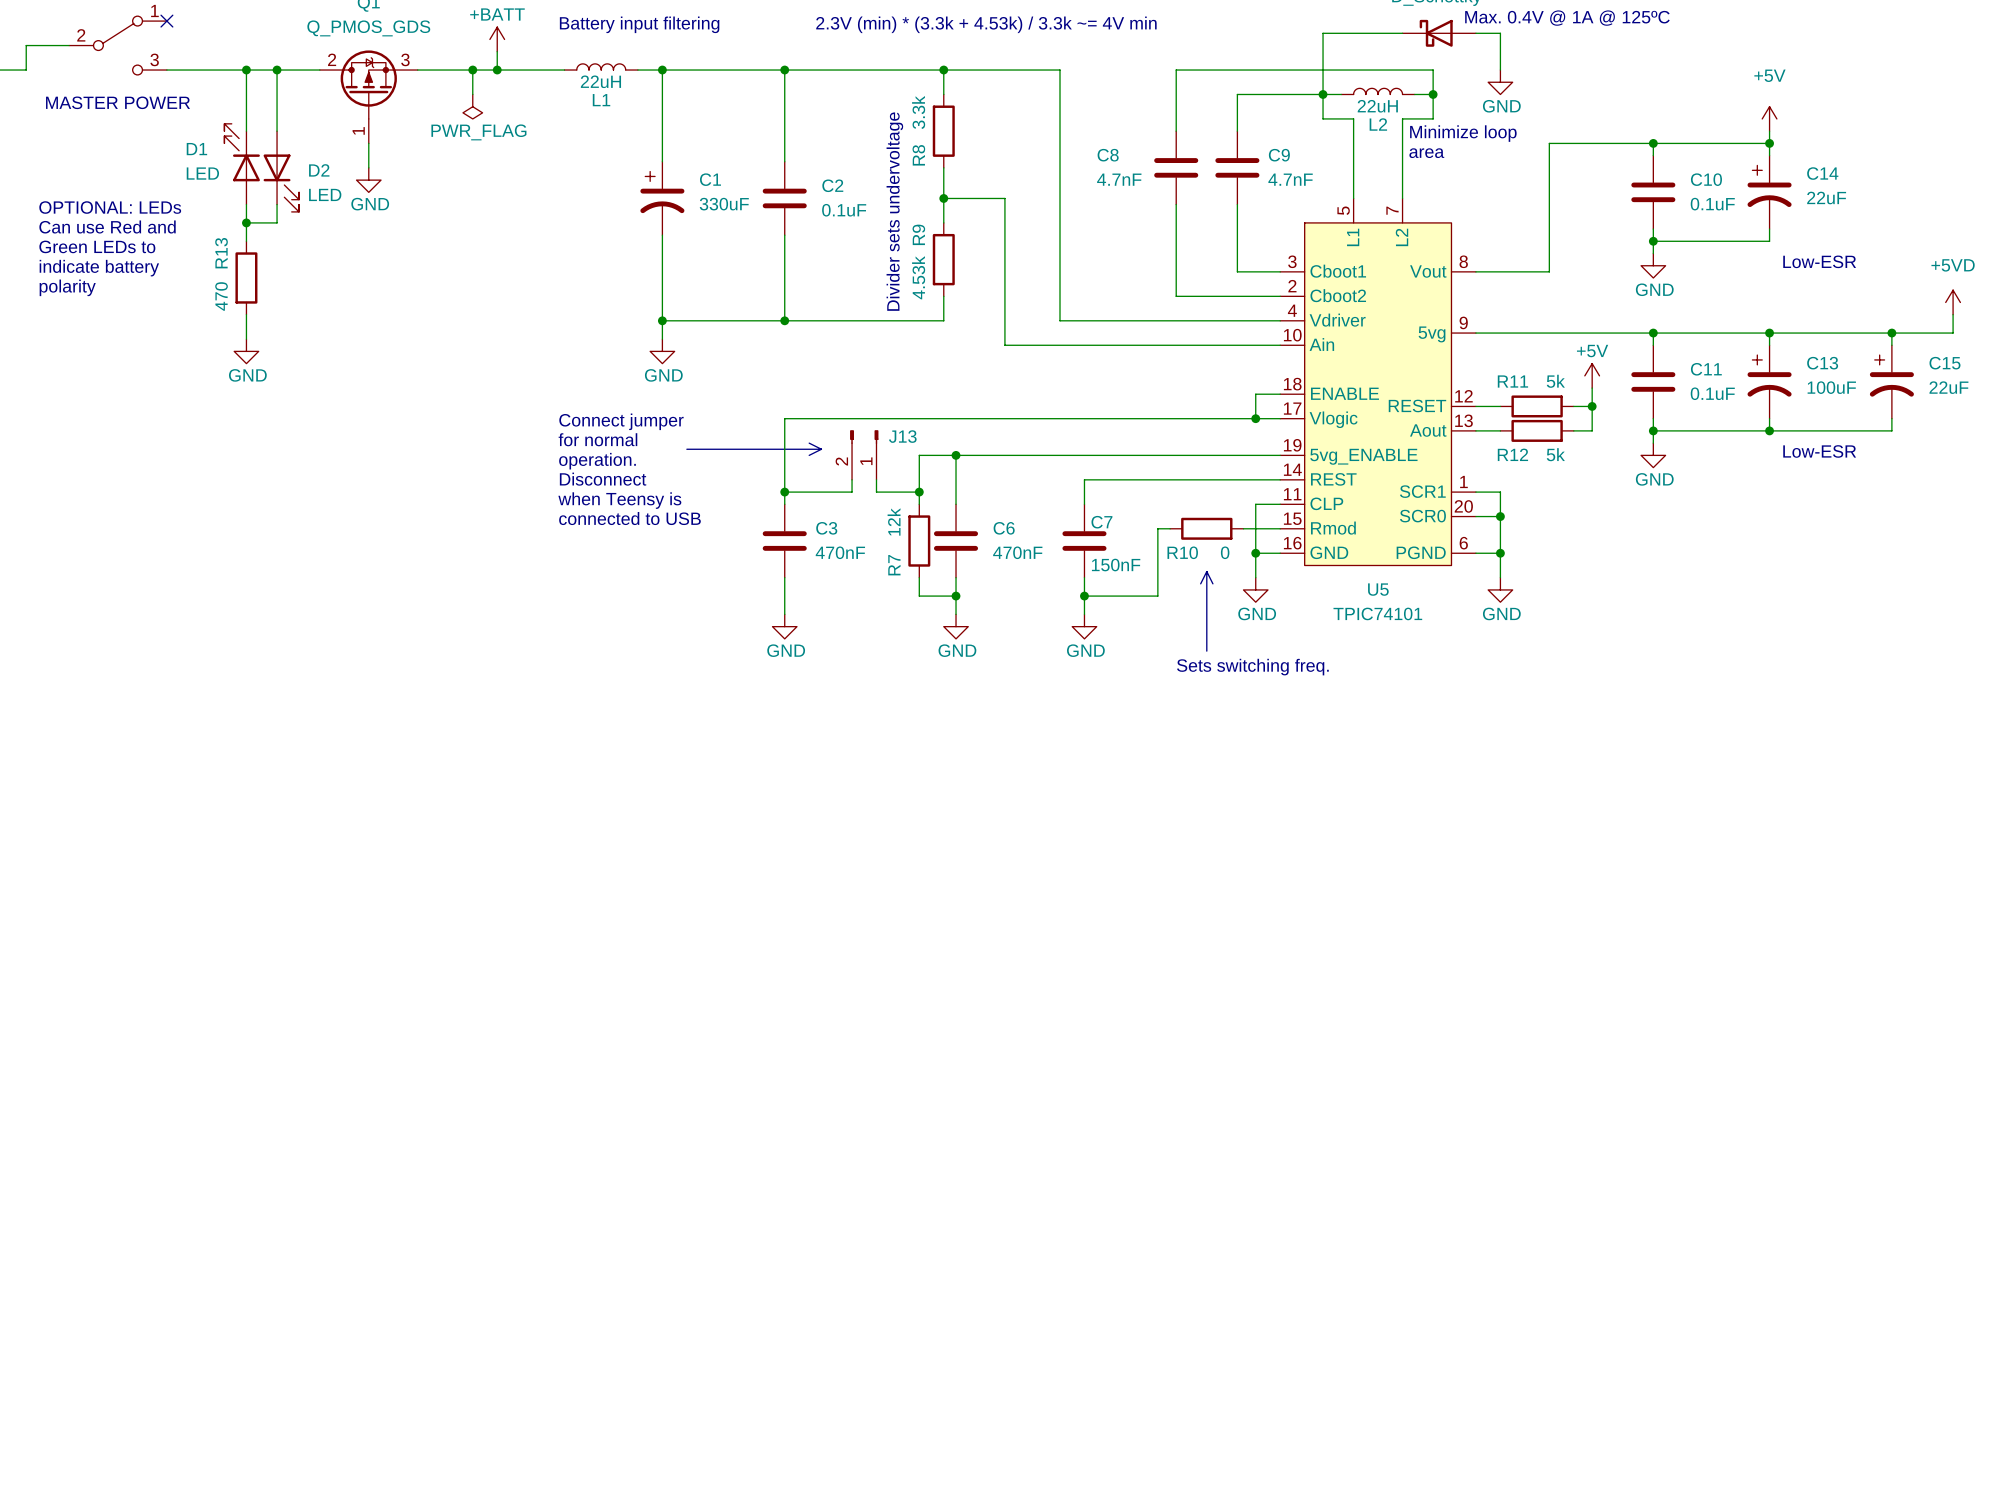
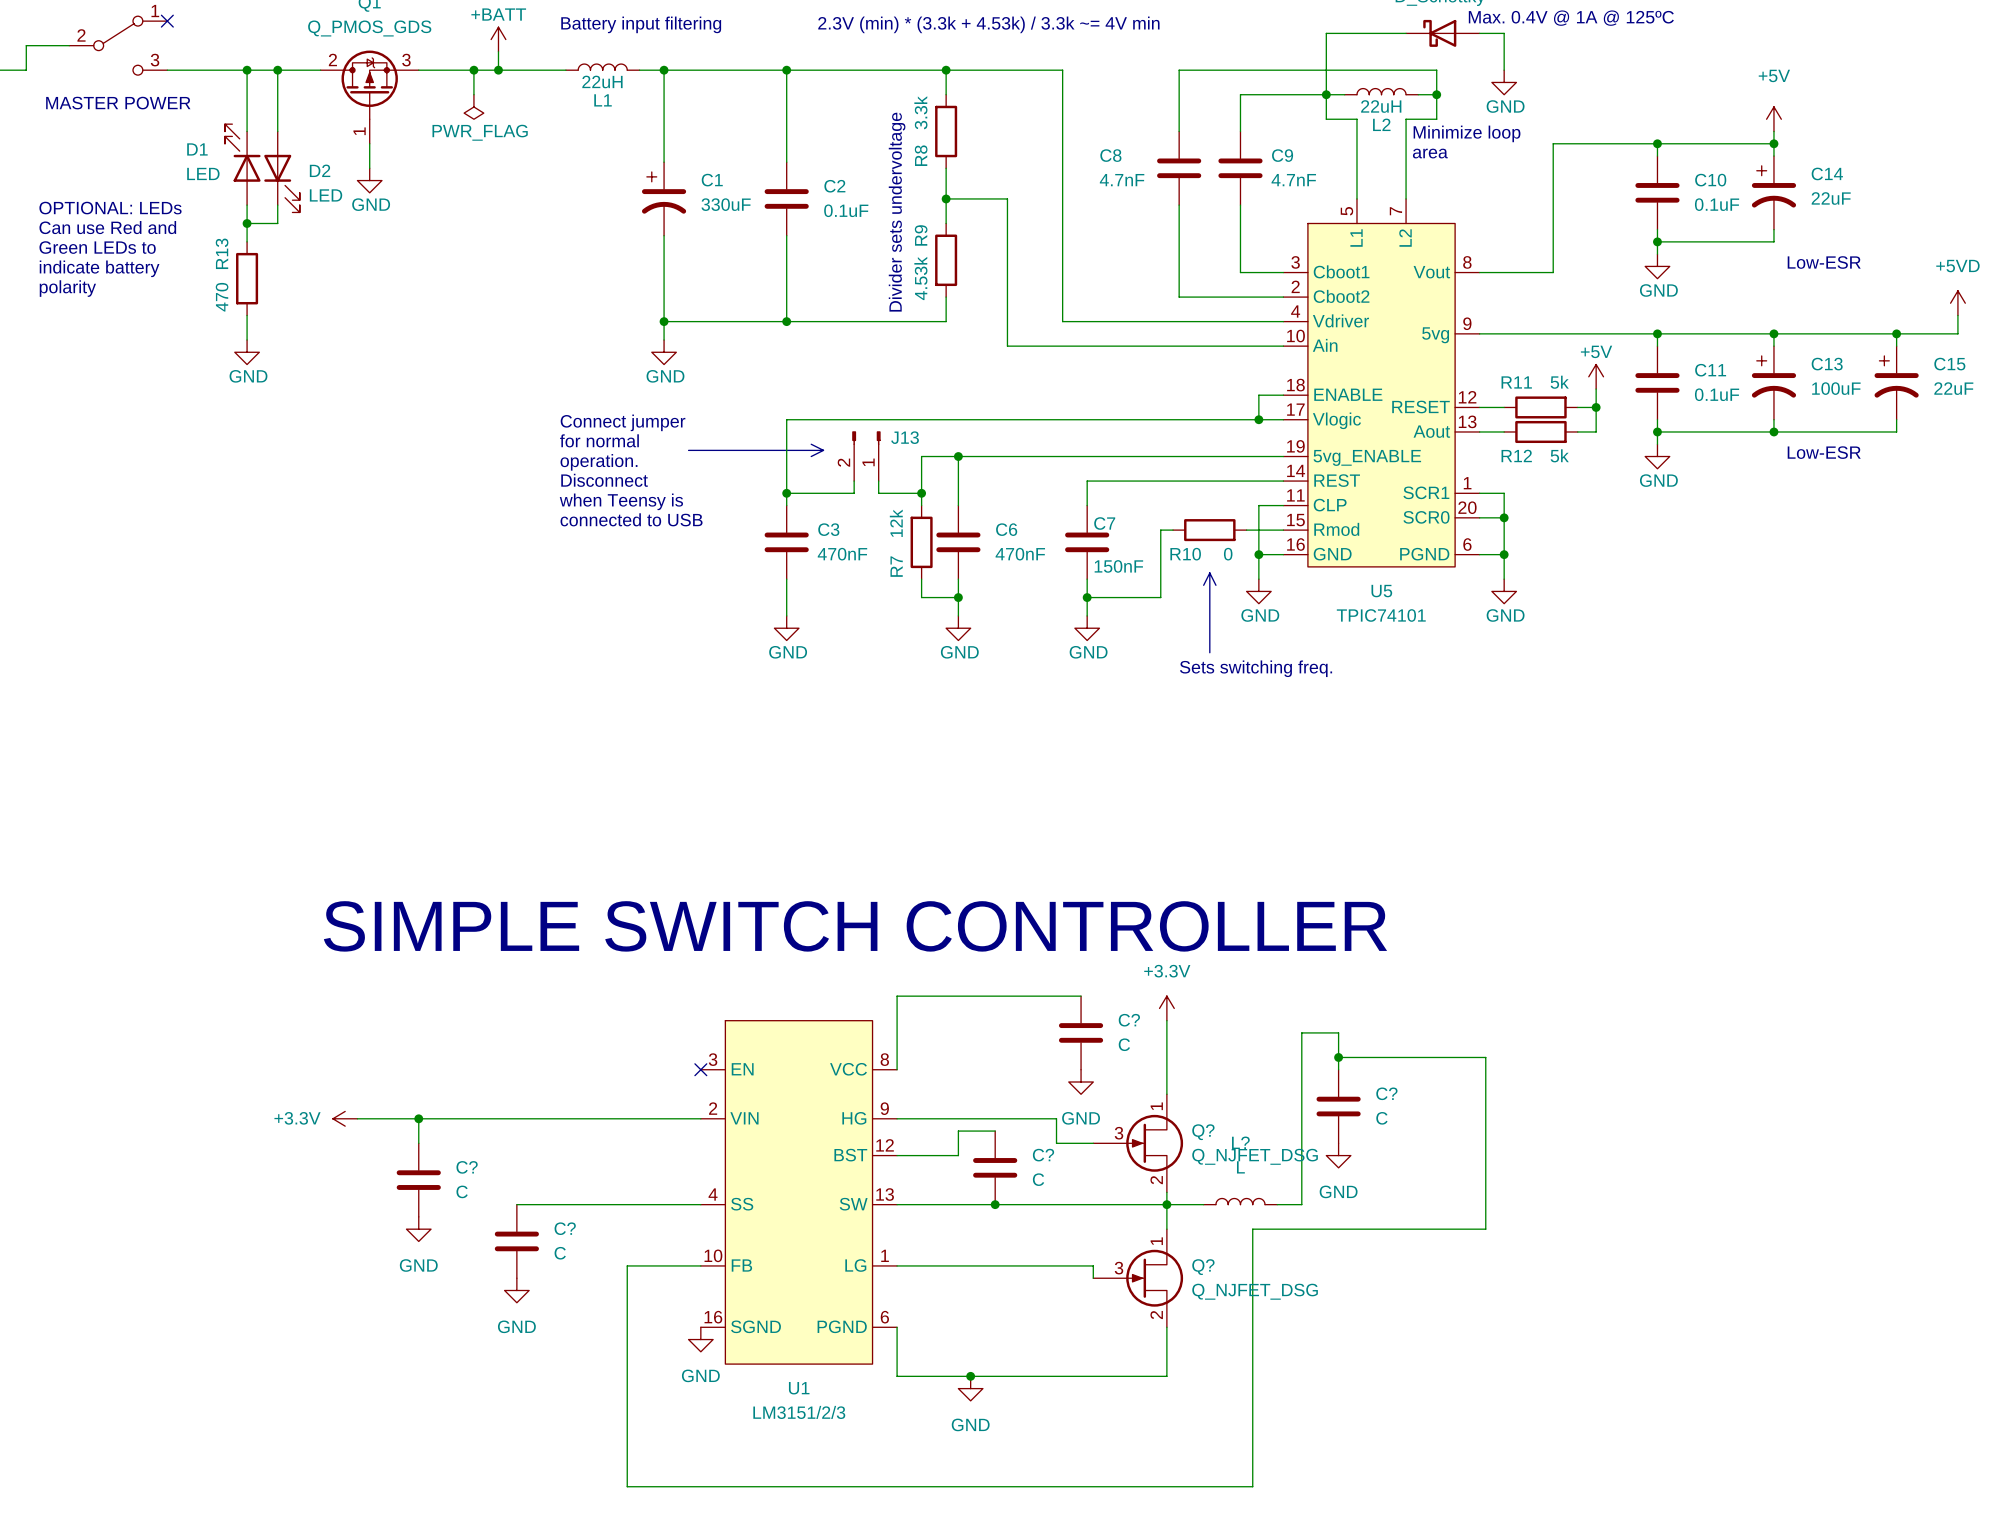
text: none -> SIMPLE SWITCH CONTROLLER (855, 926)
wire: none -> (1081, 996) (897, 996) (897, 1069)
power symbol: none -> +3.3V (1166, 1008)
wire: none -> (1166, 1020) (1166, 1094)
C?: none -> C (1081, 1032)
wire: none -> (1338, 1057) (1485, 1057) (1485, 1229) (1252, 1229) (1252, 1486) (627, 1486) (627, 1265) (700, 1265)
junction: none -> (1338, 1057)
no-connect mark: none -> (700, 1069)
wire: none -> (1338, 1069) (1338, 1032) (1301, 1032) (1301, 1204) (1277, 1204)
power symbol: none -> GND (1081, 1082)
C?: none -> C (1338, 1106)
power symbol: none -> +3.3V (345, 1118)
wire: none -> (357, 1118) (700, 1118)
wire: none -> (418, 1118) (418, 1143)
junction: none -> (418, 1118)
wire: none -> (897, 1118) (1056, 1118) (1056, 1143) (1093, 1143)
wire: none -> (995, 1131) (958, 1131) (958, 1155) (897, 1155)
Q?: none -> Q_NJFET_DSG (1138, 1143)
power symbol: none -> GND (1338, 1155)
C?: none -> C (995, 1167)
C?: none -> C (418, 1180)
U1: none -> LM3151/2/3 (798, 1192)
wire: none -> (1166, 1192) (1166, 1229)
L?: none -> L (1240, 1201)
wire: none -> (516, 1204) (700, 1204)
wire: none -> (897, 1204) (1203, 1204)
junction: none -> (995, 1204)
junction: none -> (1166, 1204)
power symbol: none -> GND (418, 1229)
C?: none -> C (516, 1241)
wire: none -> (897, 1265) (1093, 1265) (1093, 1278)
Q?: none -> Q_NJFET_DSG (1138, 1278)
power symbol: none -> GND (516, 1290)
wire: none -> (897, 1327) (897, 1376) (1166, 1376) (1166, 1327)
power symbol: none -> GND (700, 1339)
junction: none -> (970, 1376)
power symbol: none -> GND (970, 1388)

